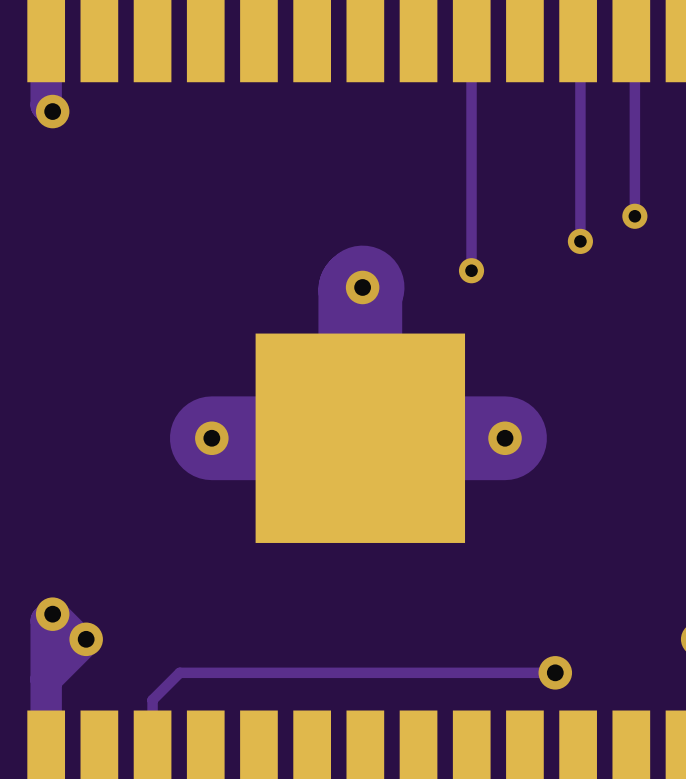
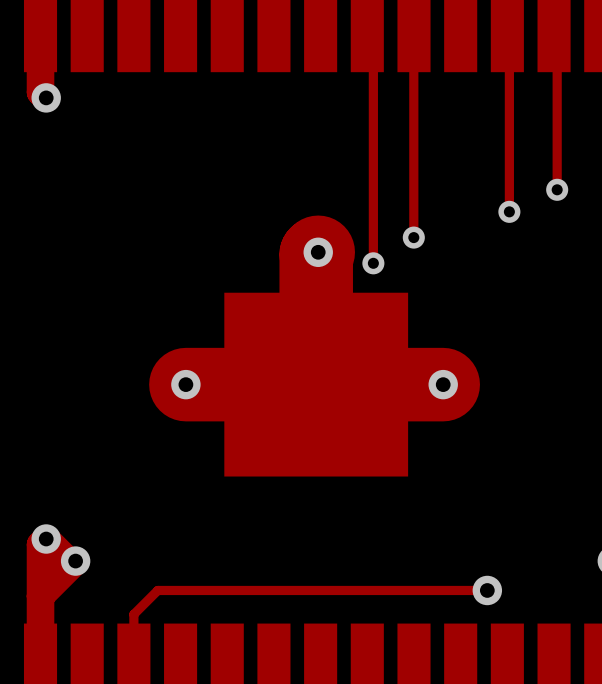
track: none -> (367, 35) (373, 41) (373, 263)
via: none -> (373, 263)

